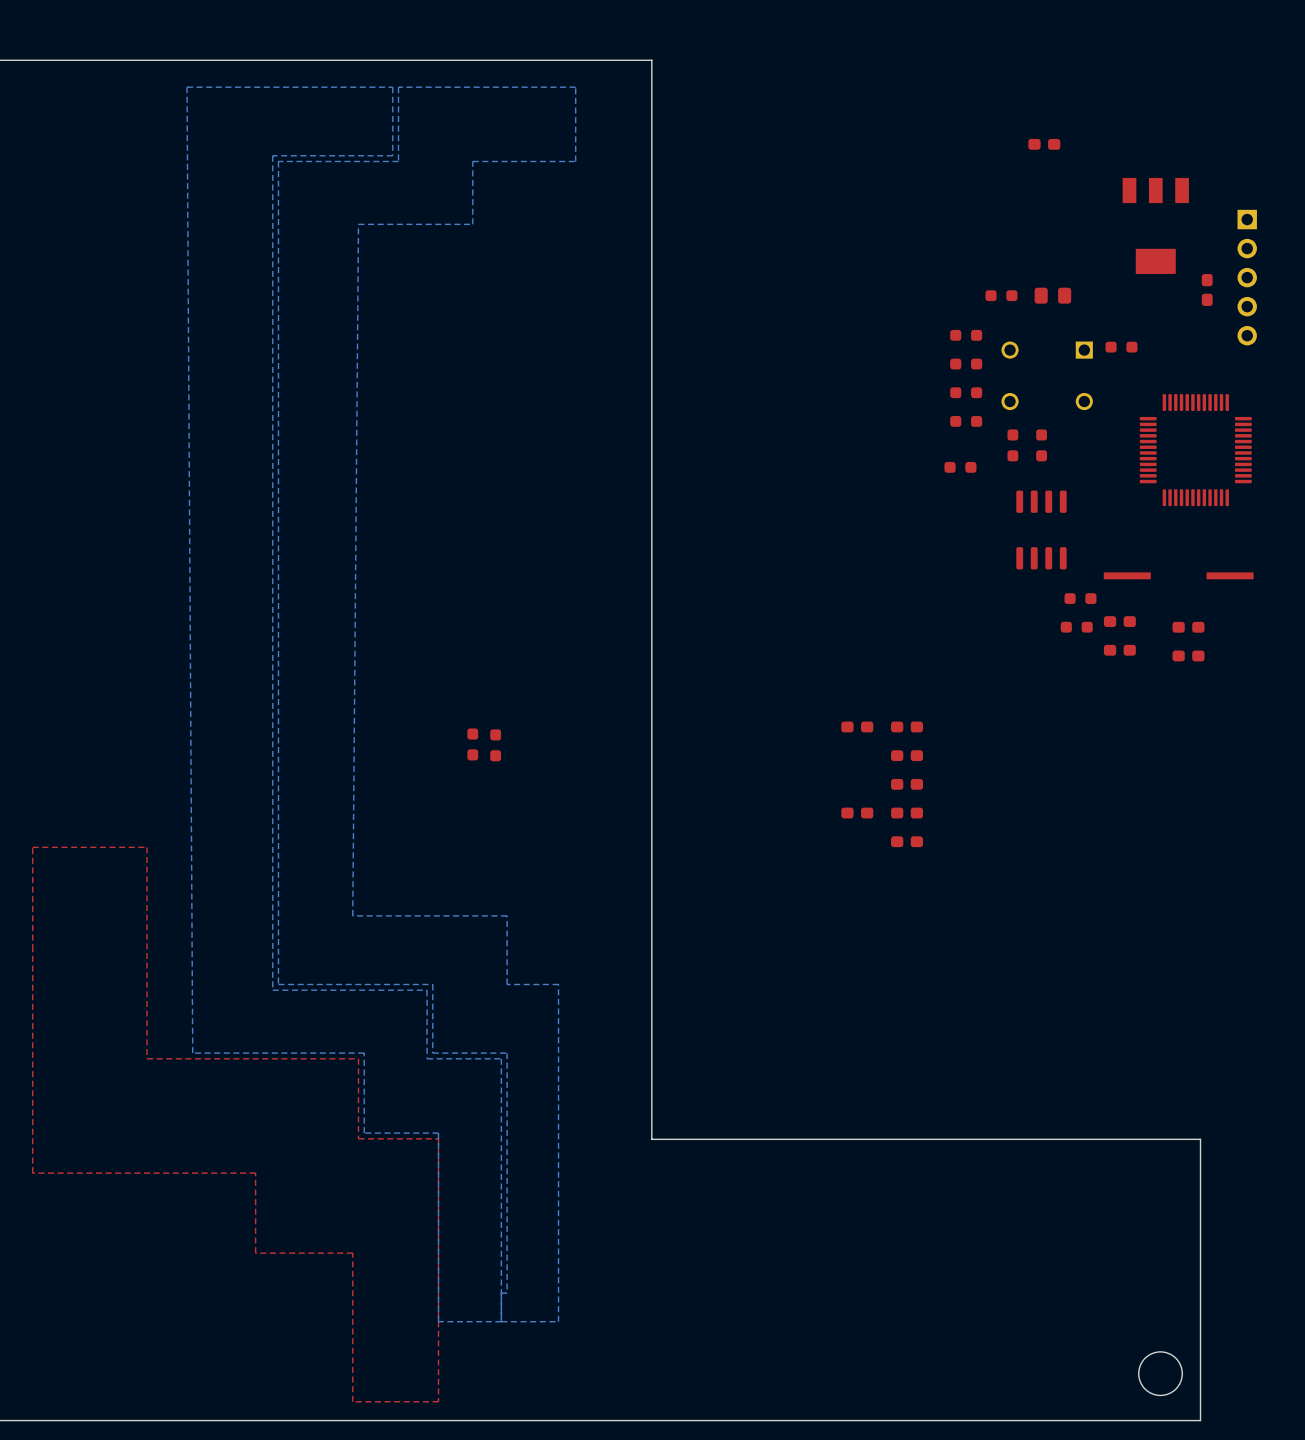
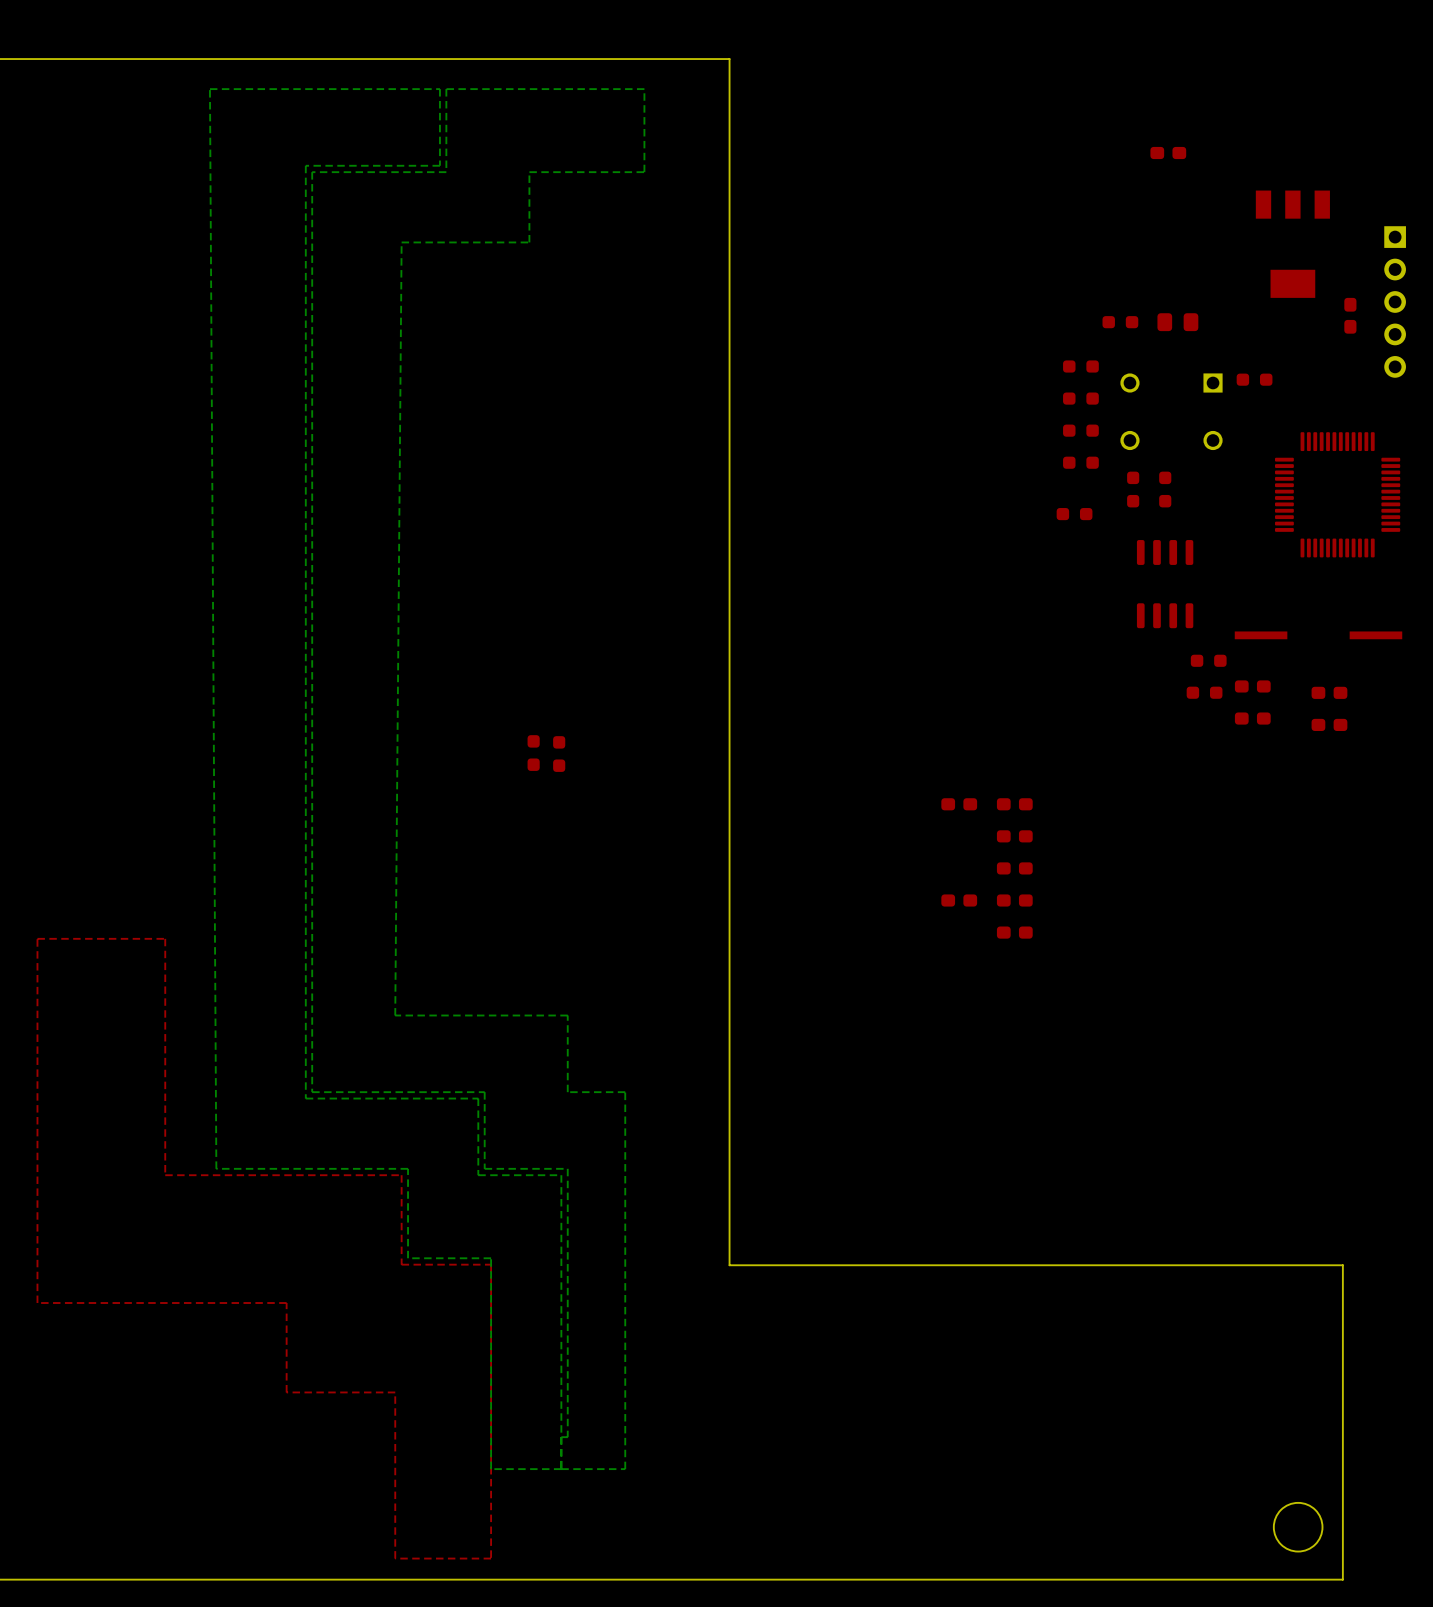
part: none -> (533, 753)
part: none -> (559, 754)
part: (472, 744) -> none
part: (495, 745) -> none

